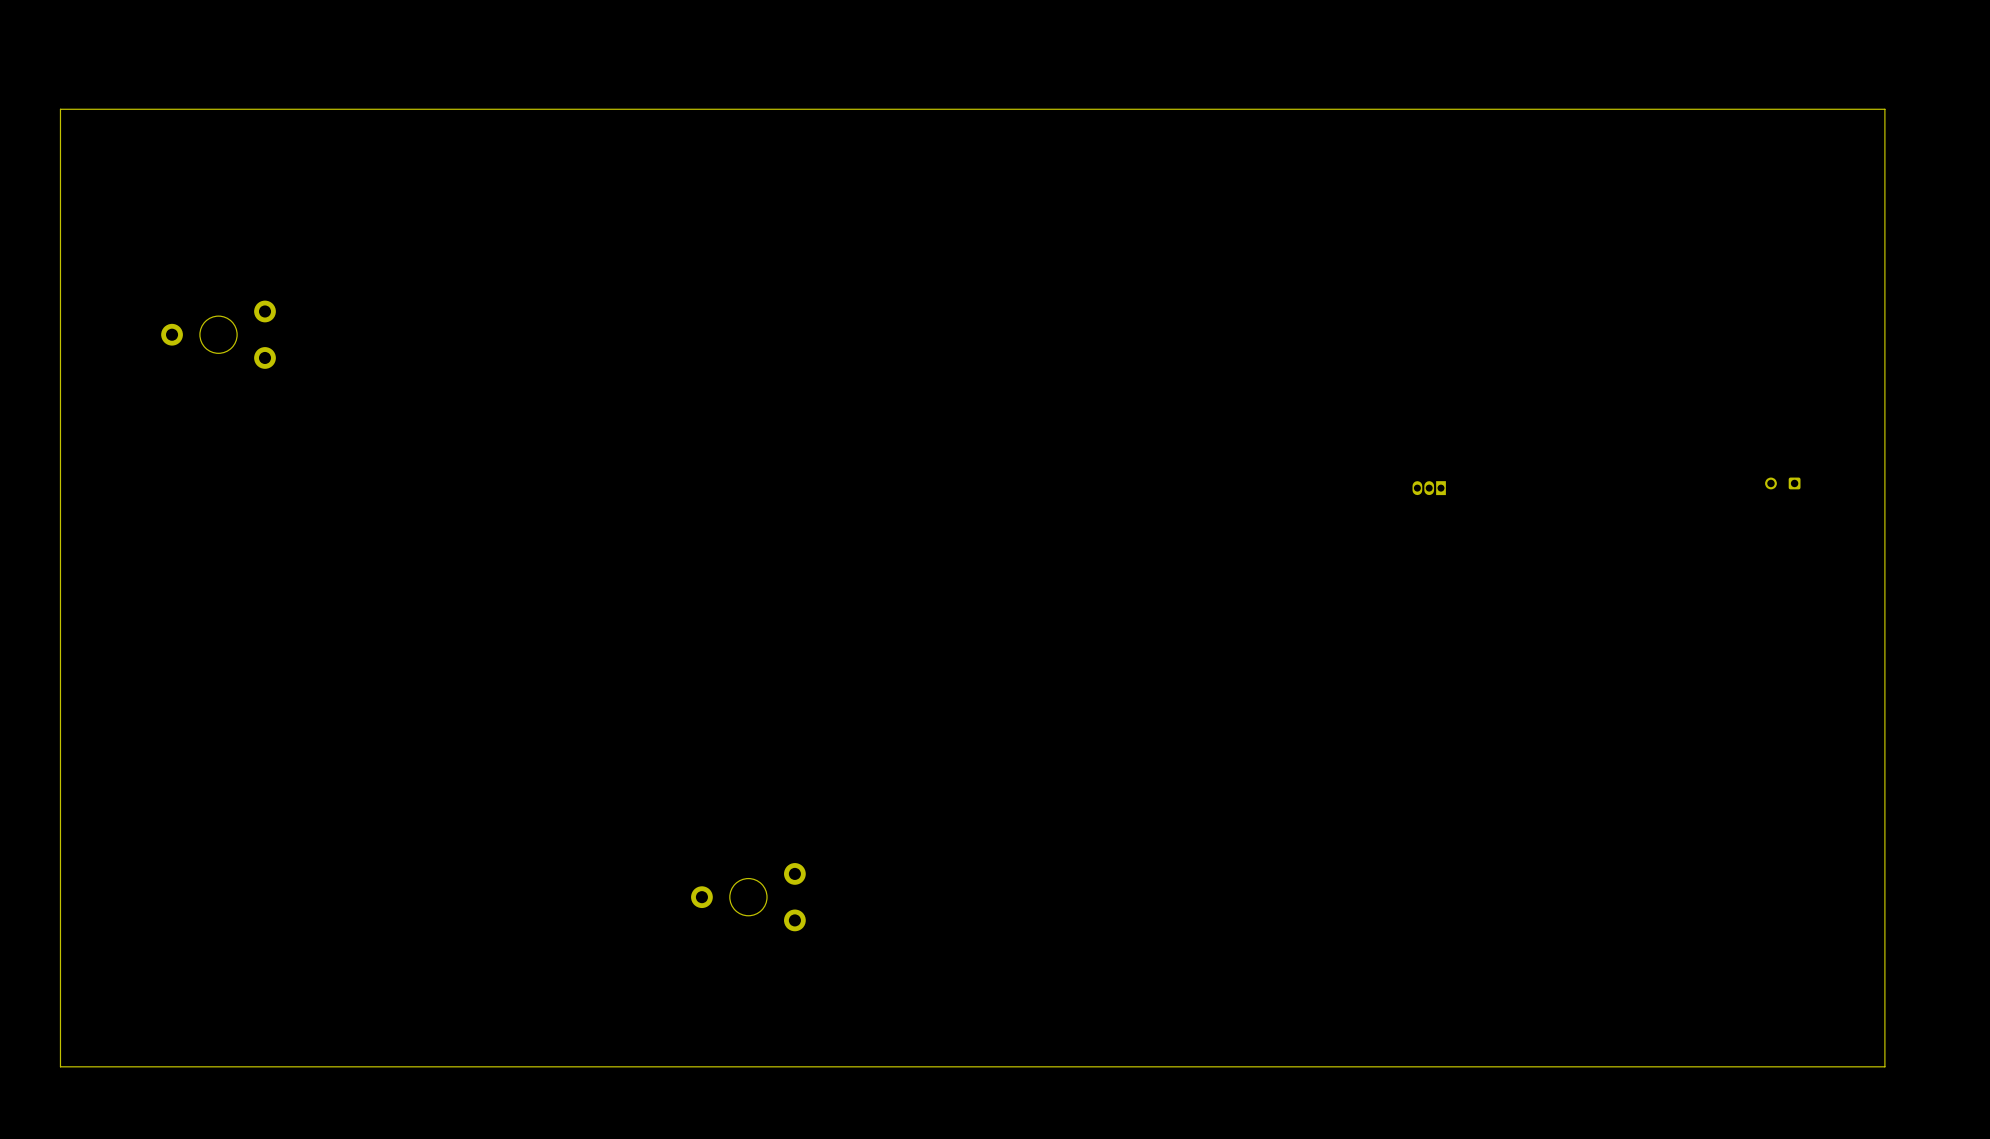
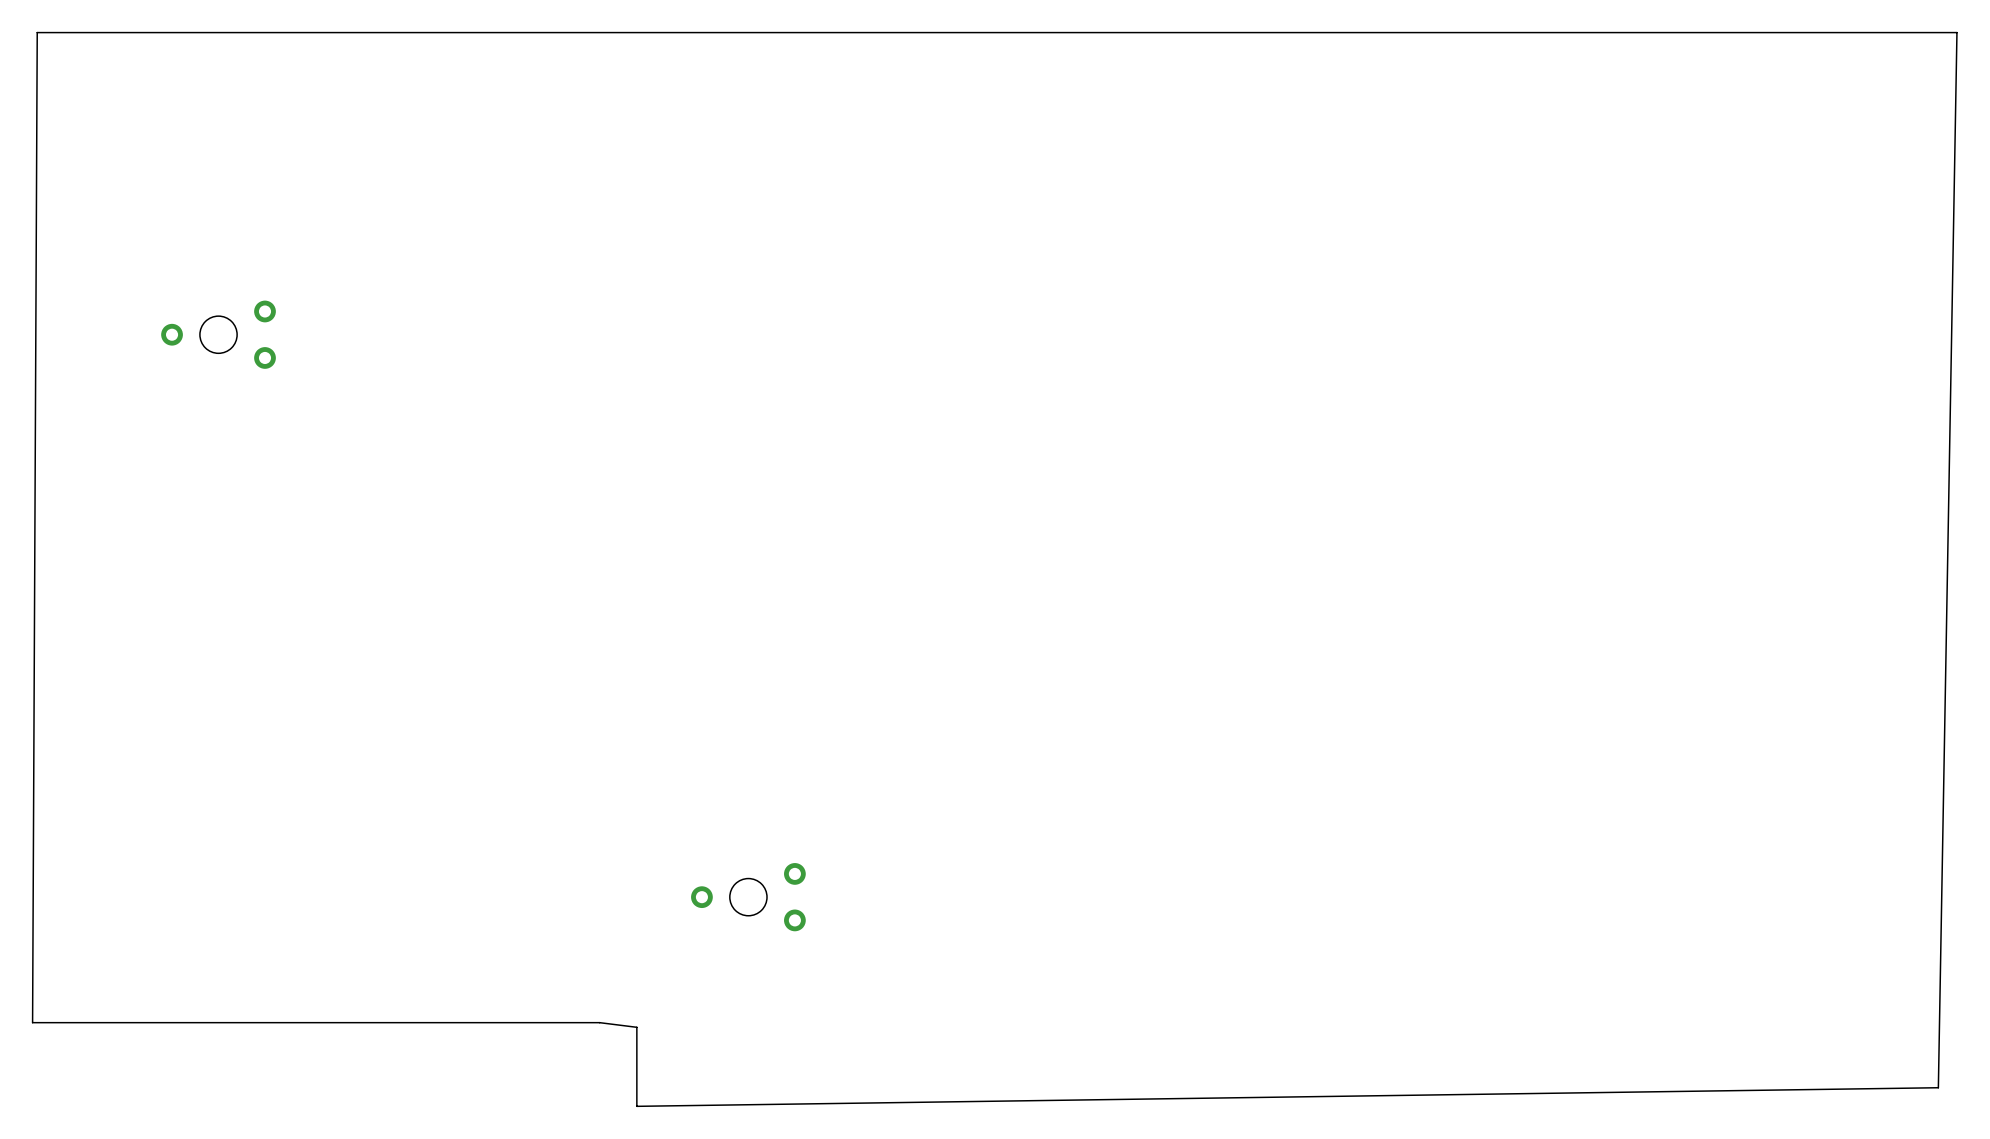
board edge: (1884, 109) (60, 109) (60, 1066) (1884, 1066) (1884, 109) -> (1956, 32) (1938, 1087) (636, 1106) (636, 1027) (599, 1022) (32, 1022) (37, 32) (1956, 32)
part: (1782, 483) -> none
part: (1429, 488) -> none

